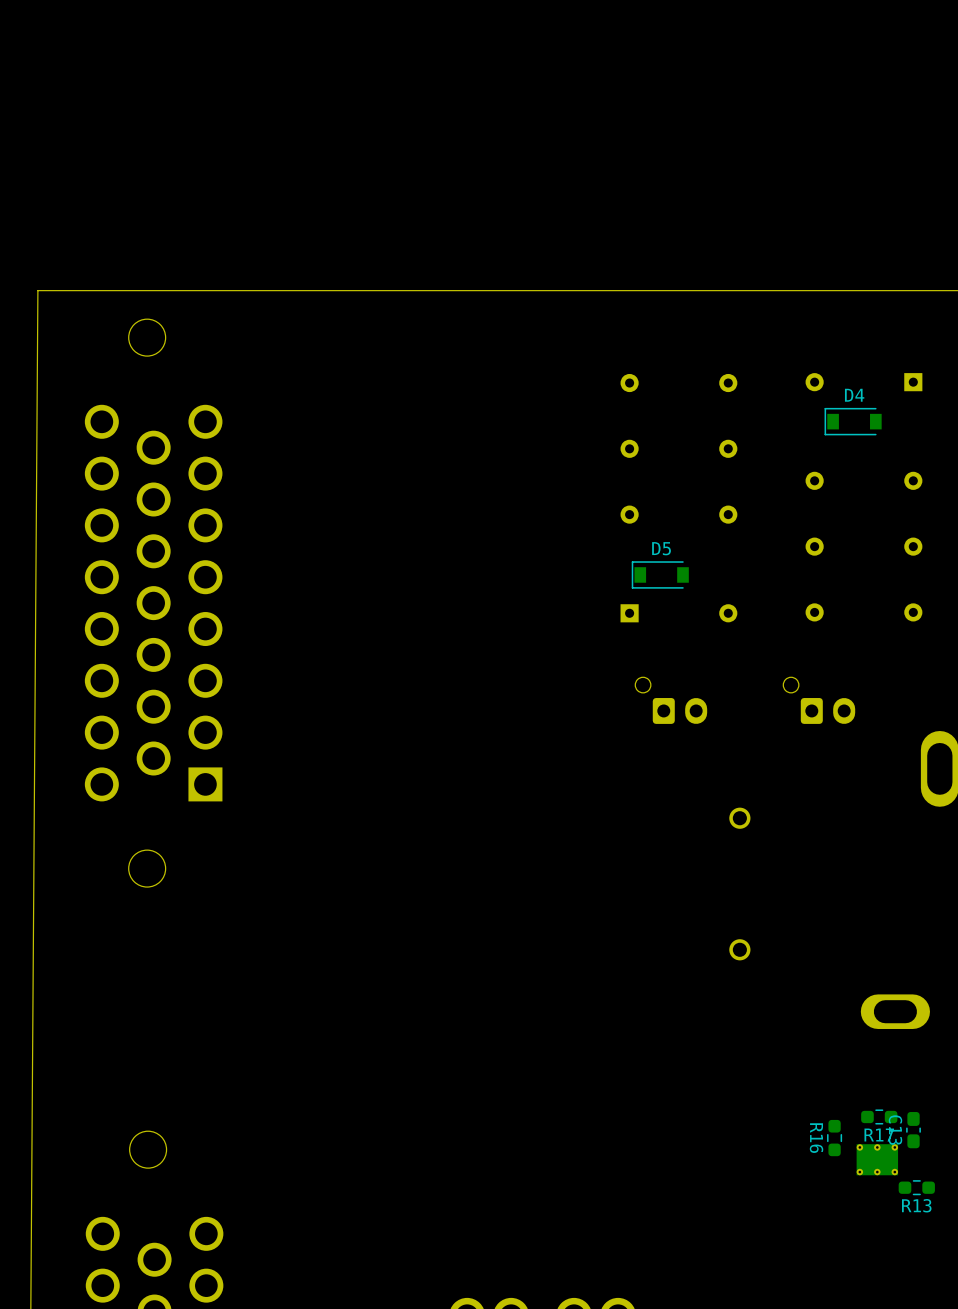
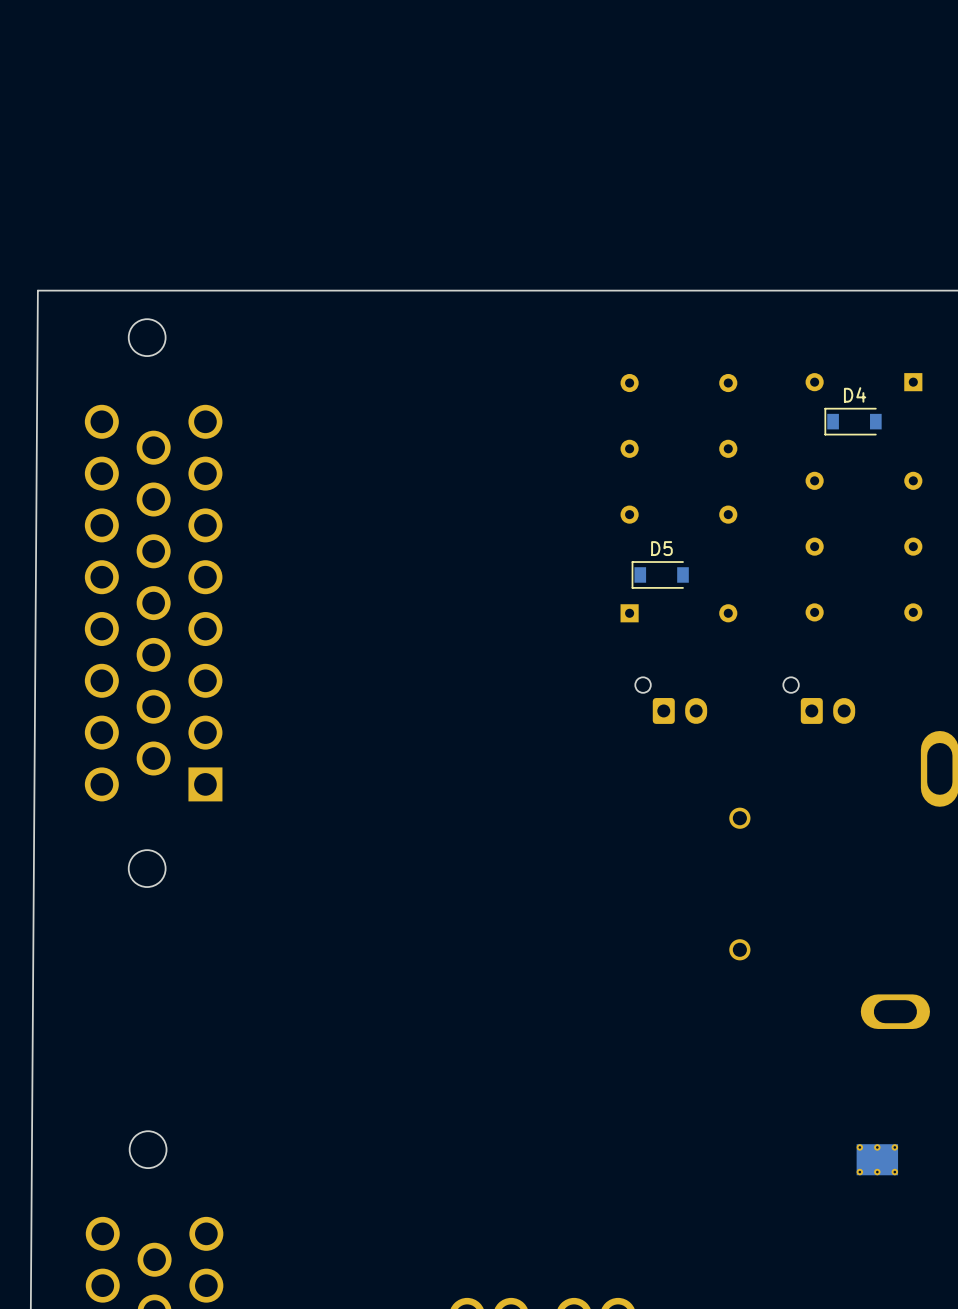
R17: (879, 1116) -> none
C13: (913, 1130) -> none
R16: (834, 1138) -> none
R13: (916, 1187) -> none

